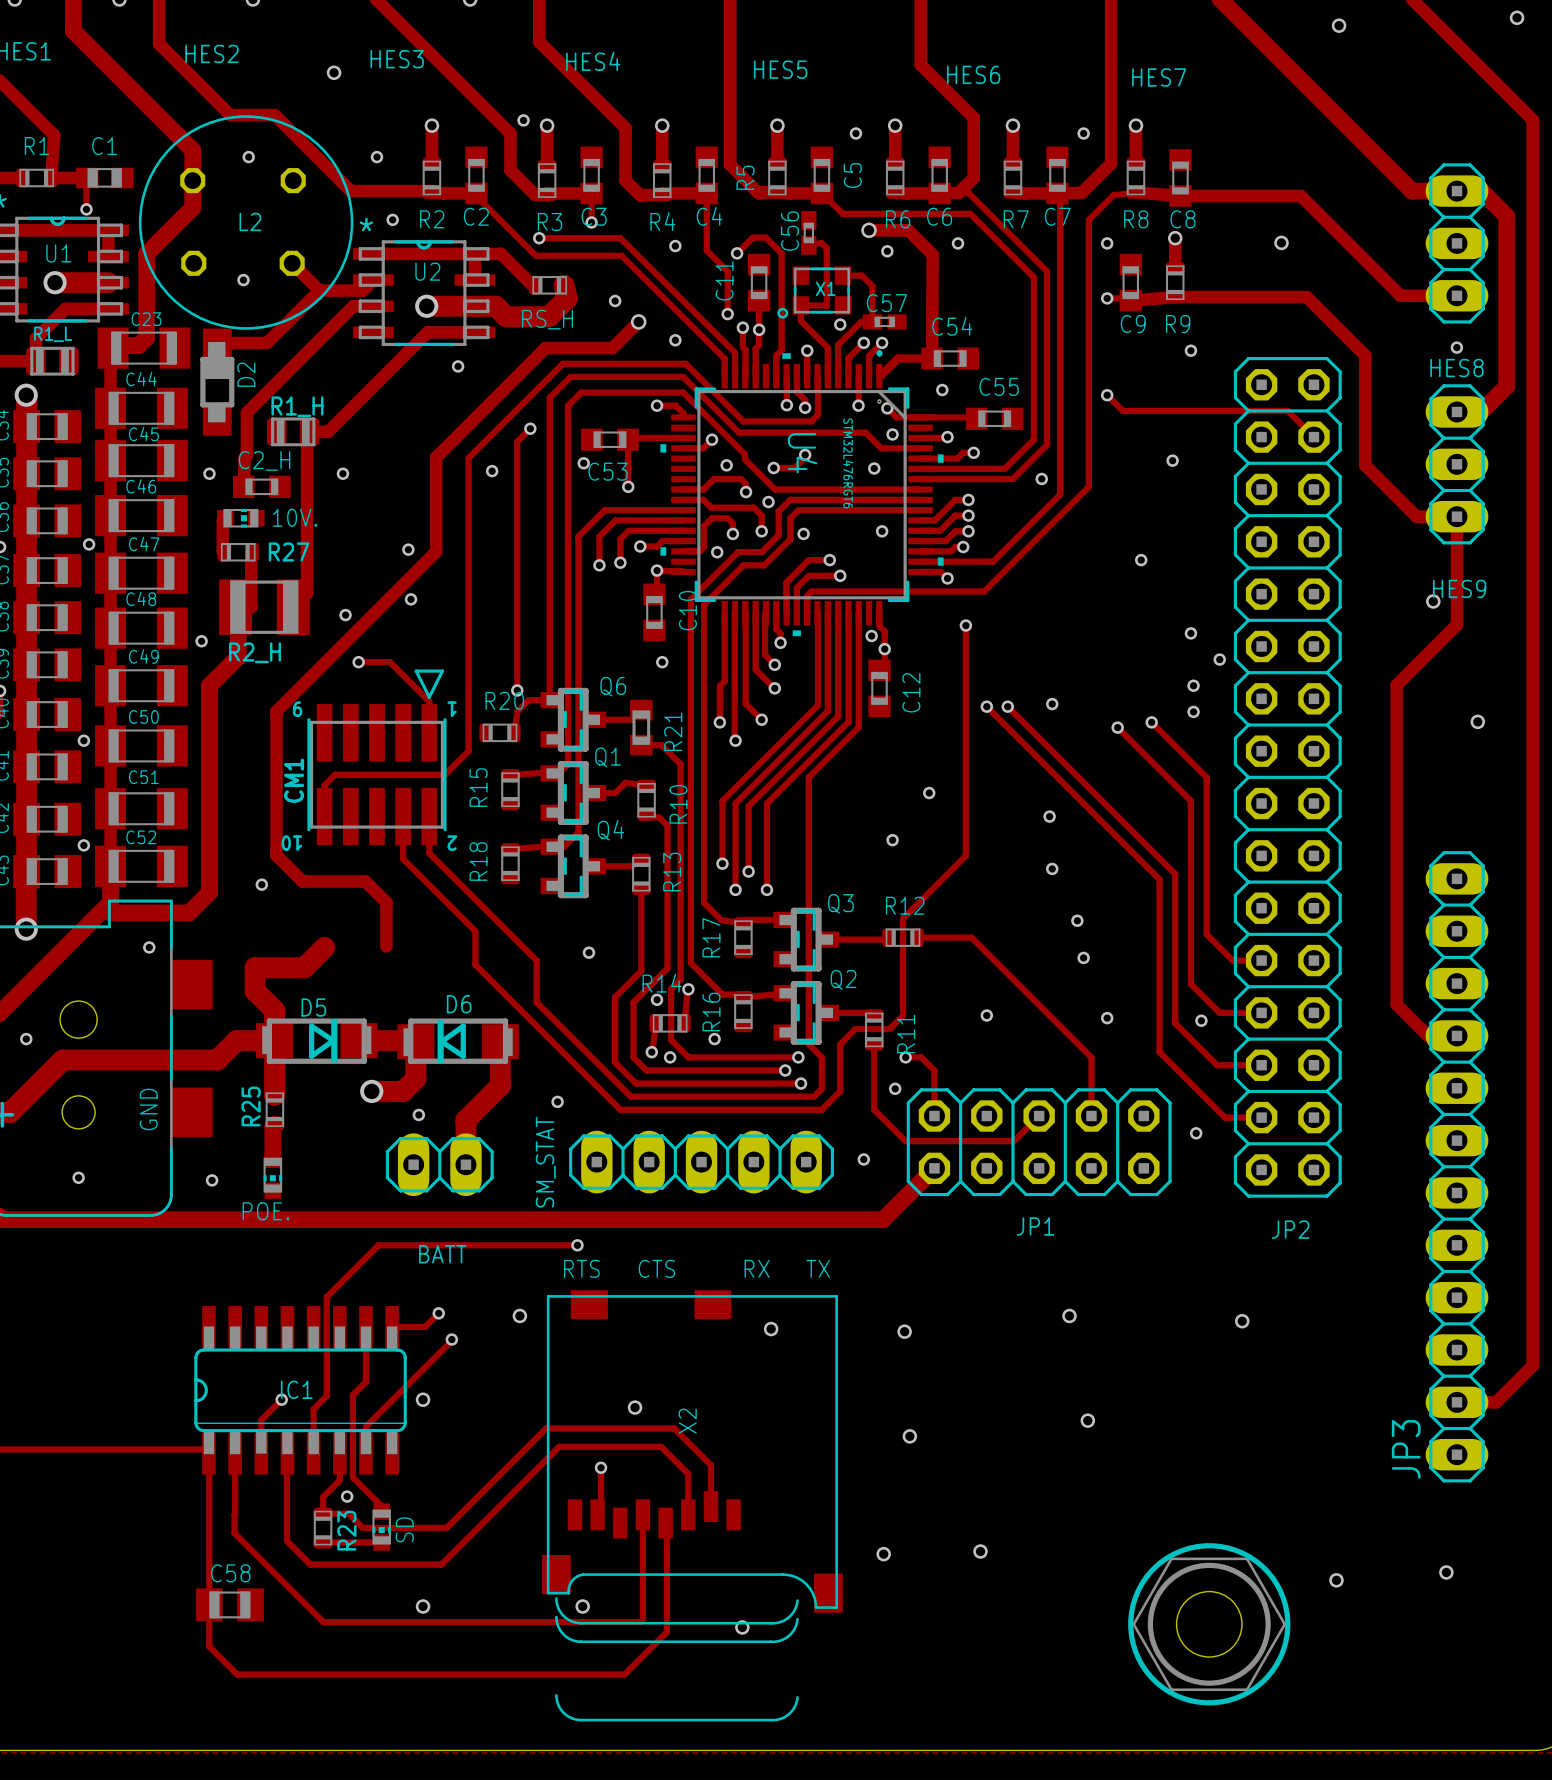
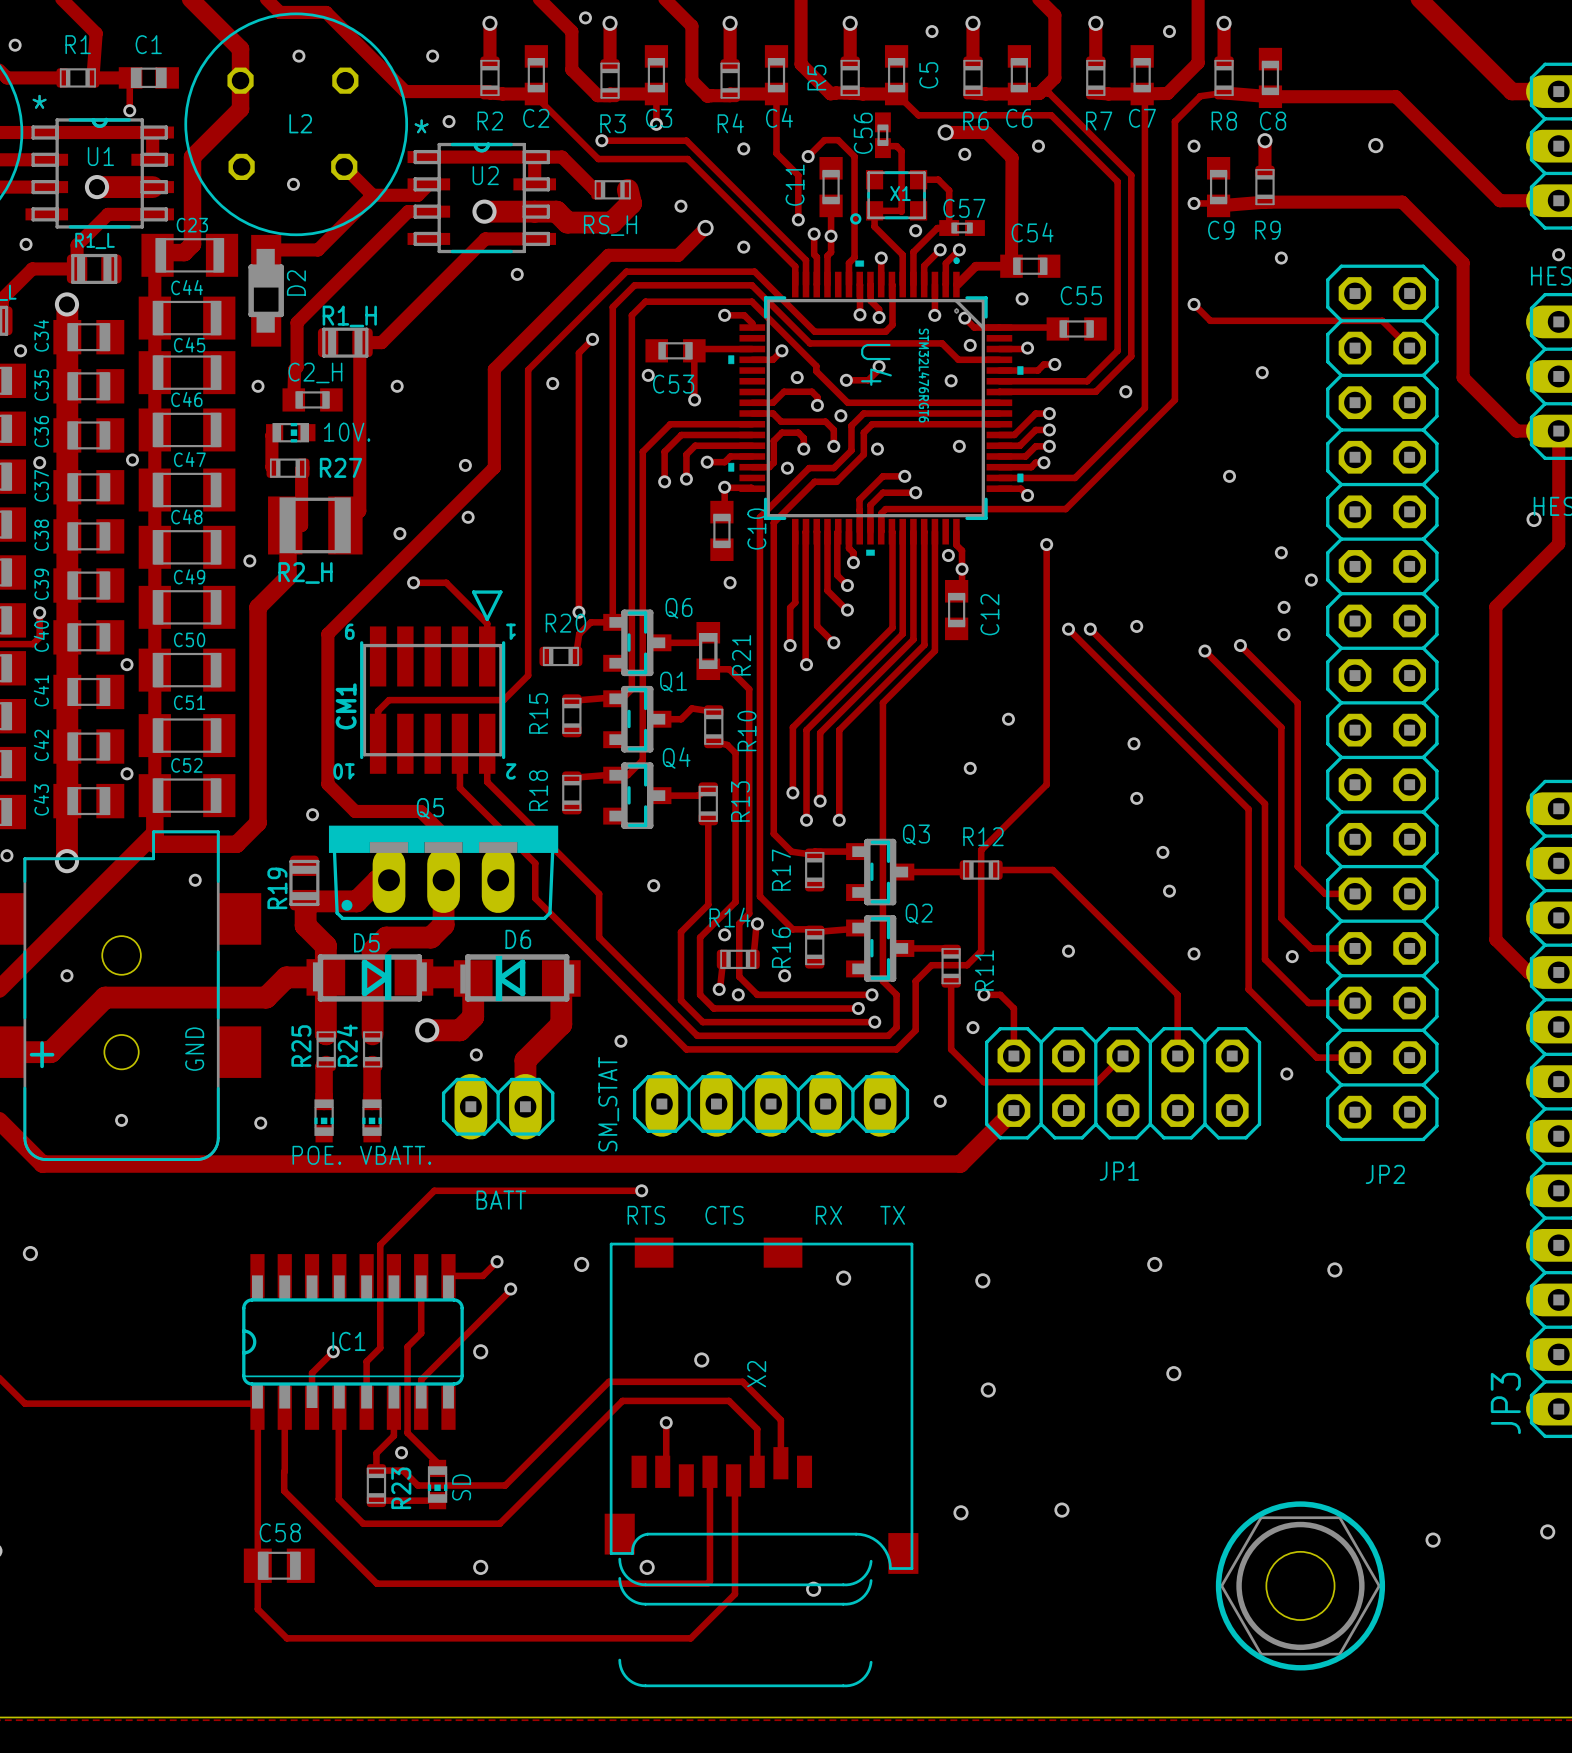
Q5: none -> (443, 872)
track: none -> (442, 879) (443, 924) (431, 937) (386, 937) (372, 951) (372, 1034)
R19: none -> (304, 882)
R24: none -> (372, 1049)
track: none -> (372, 1064) (372, 1101)
VBATT.: none -> (372, 1117)

